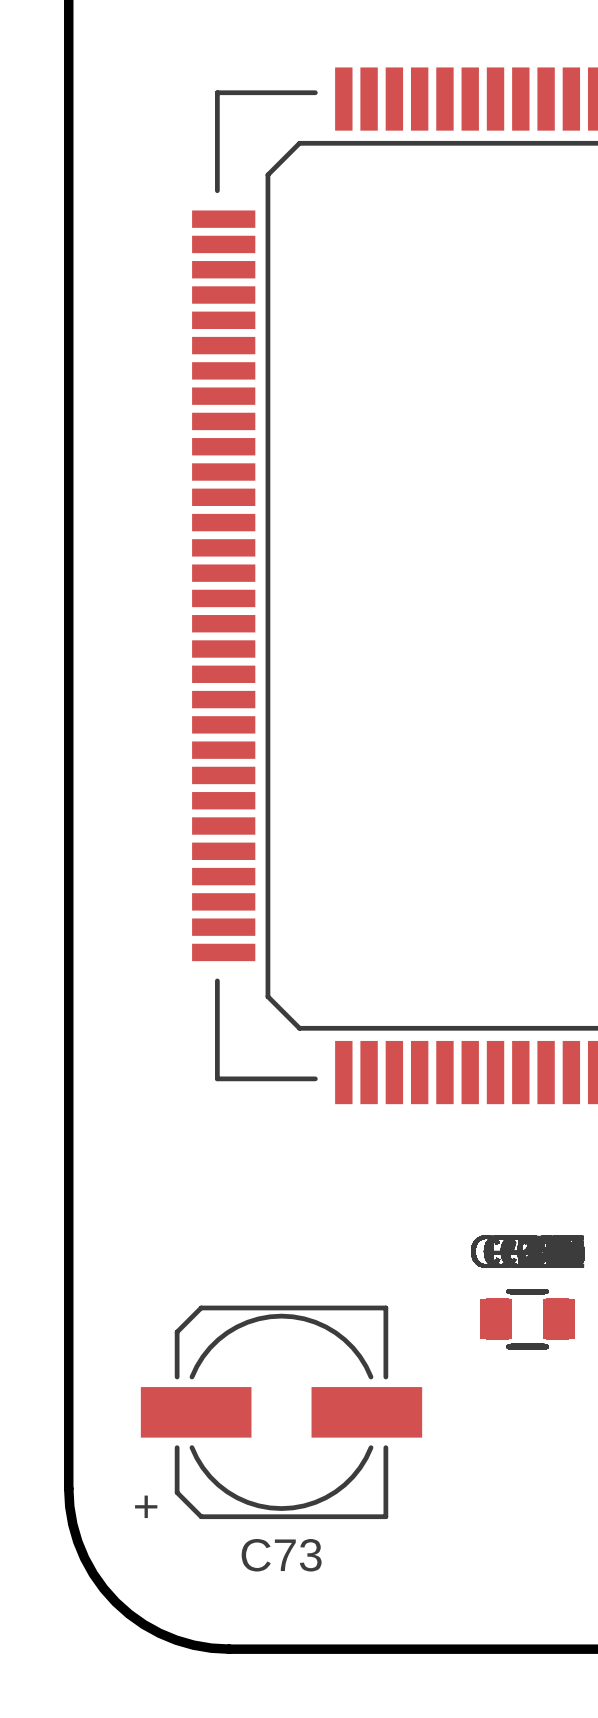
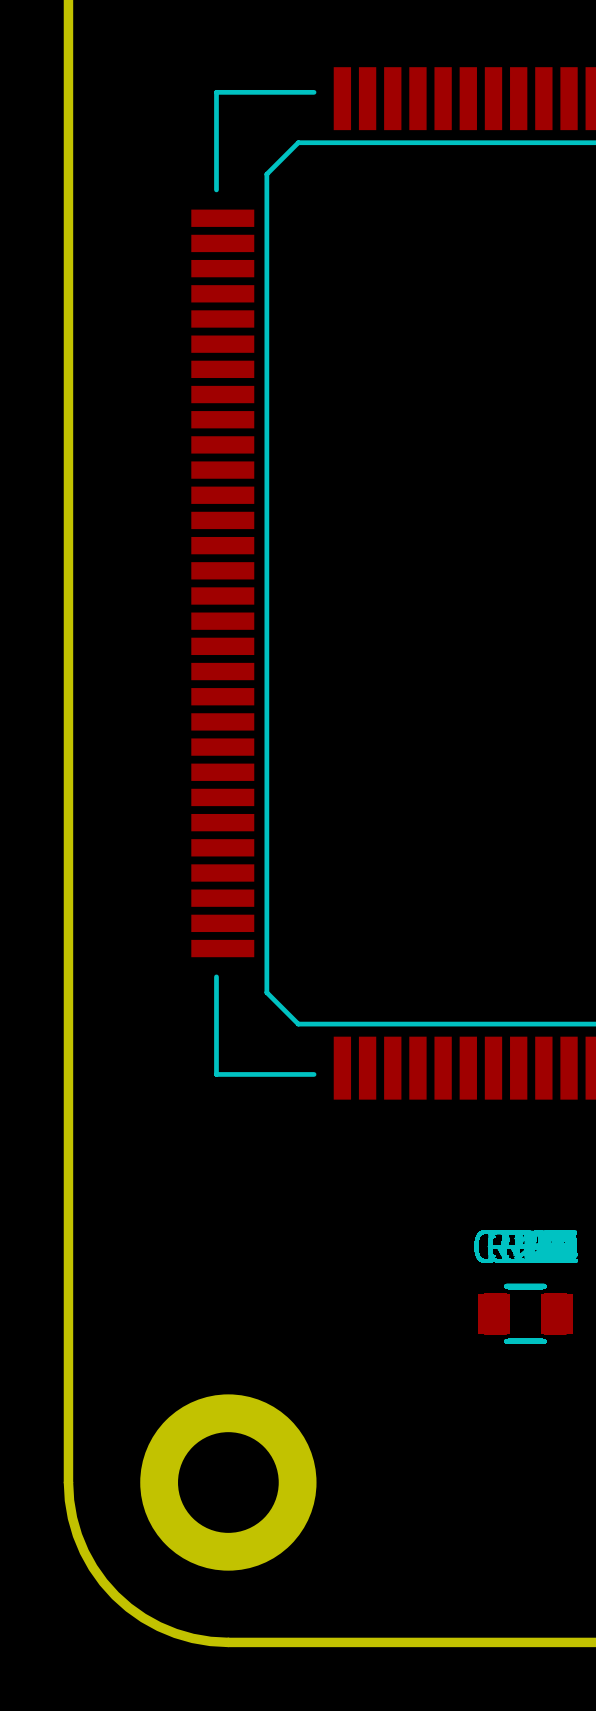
C73: (281, 1412) -> none
part: none -> (228, 1482)

